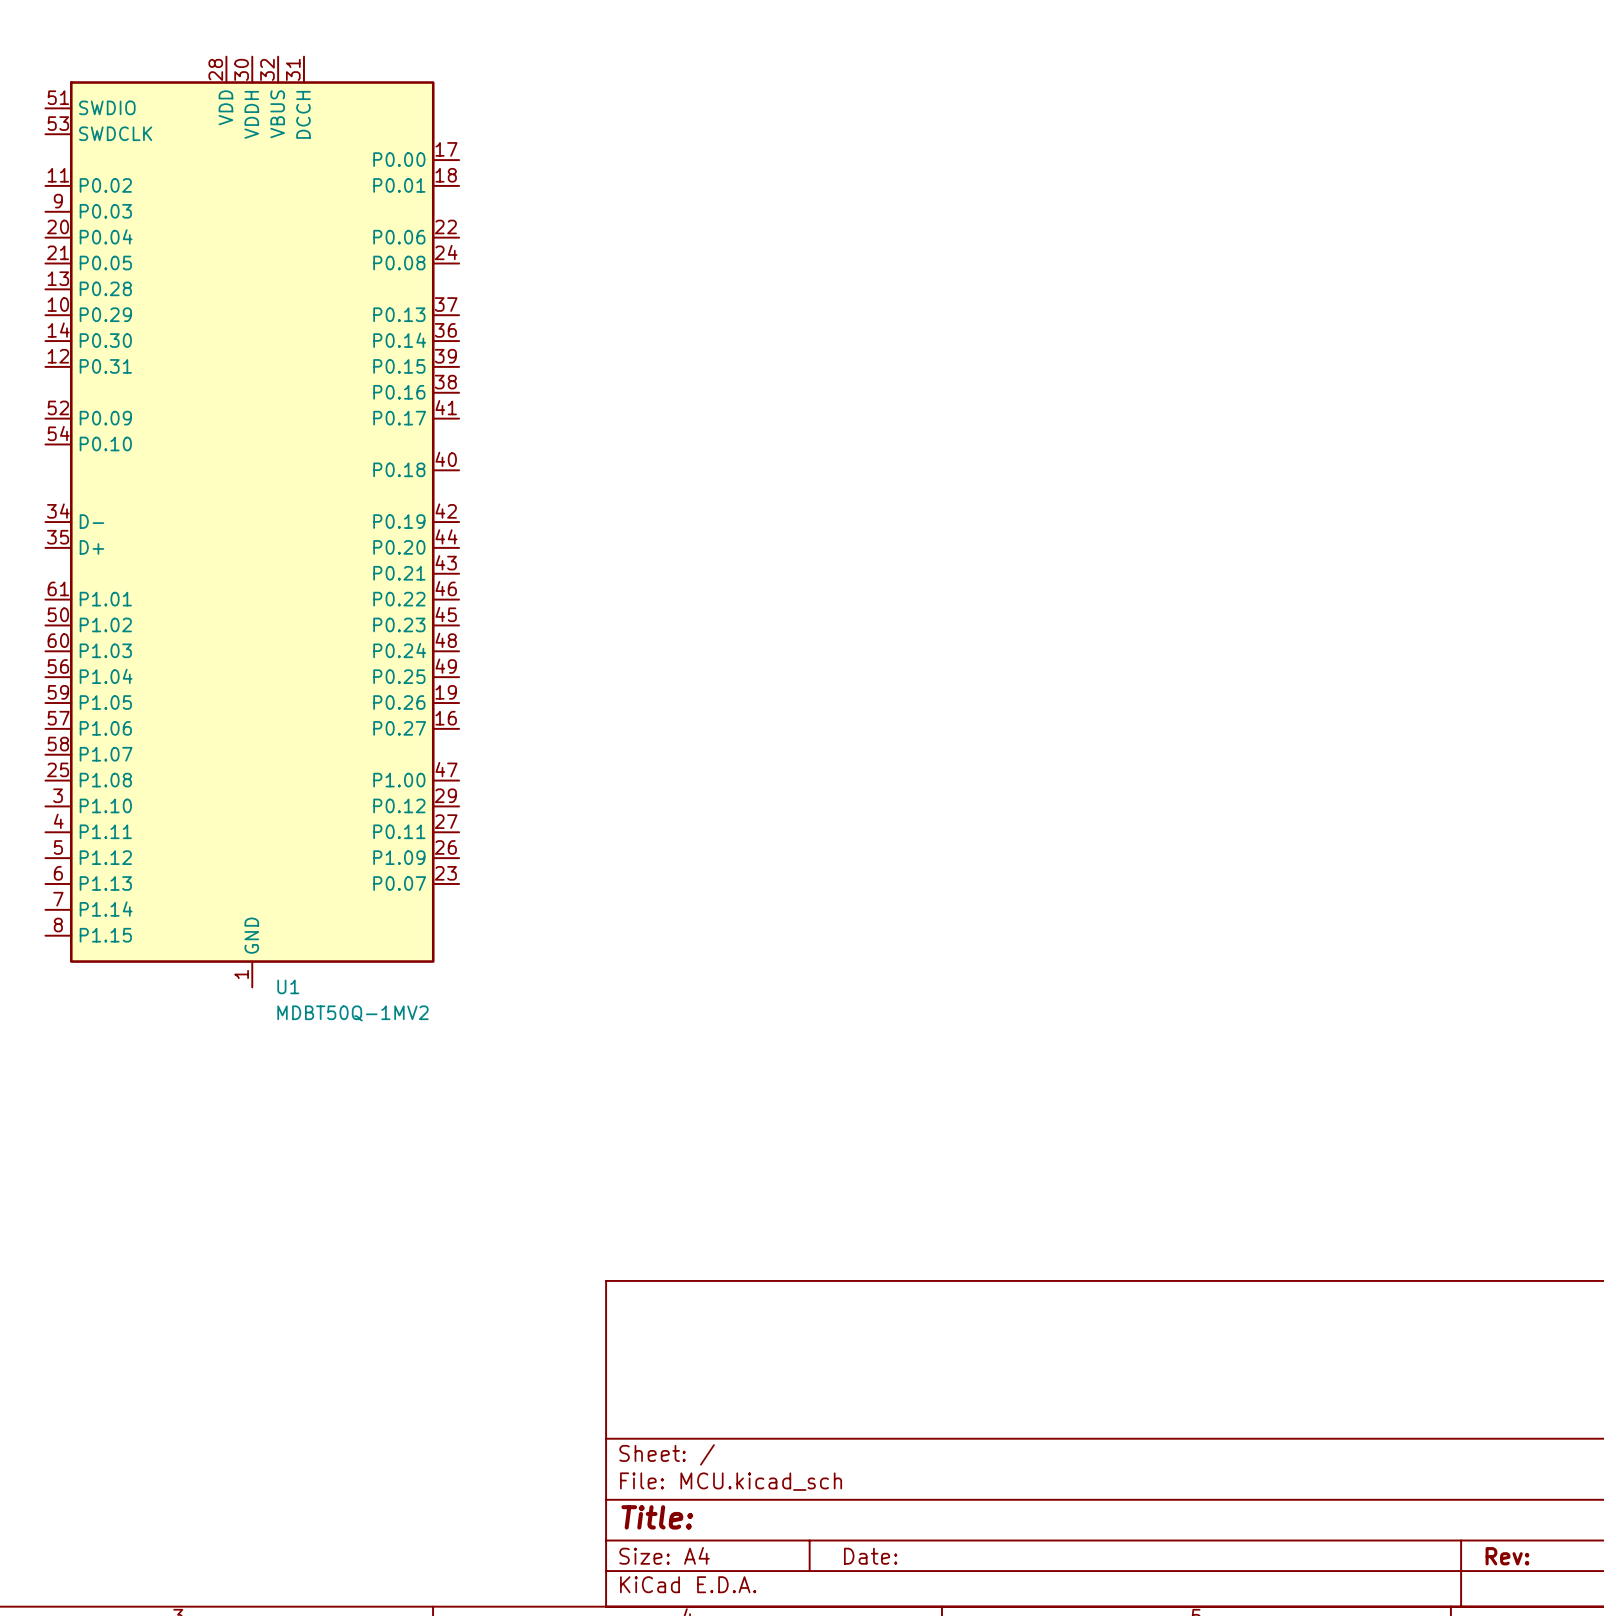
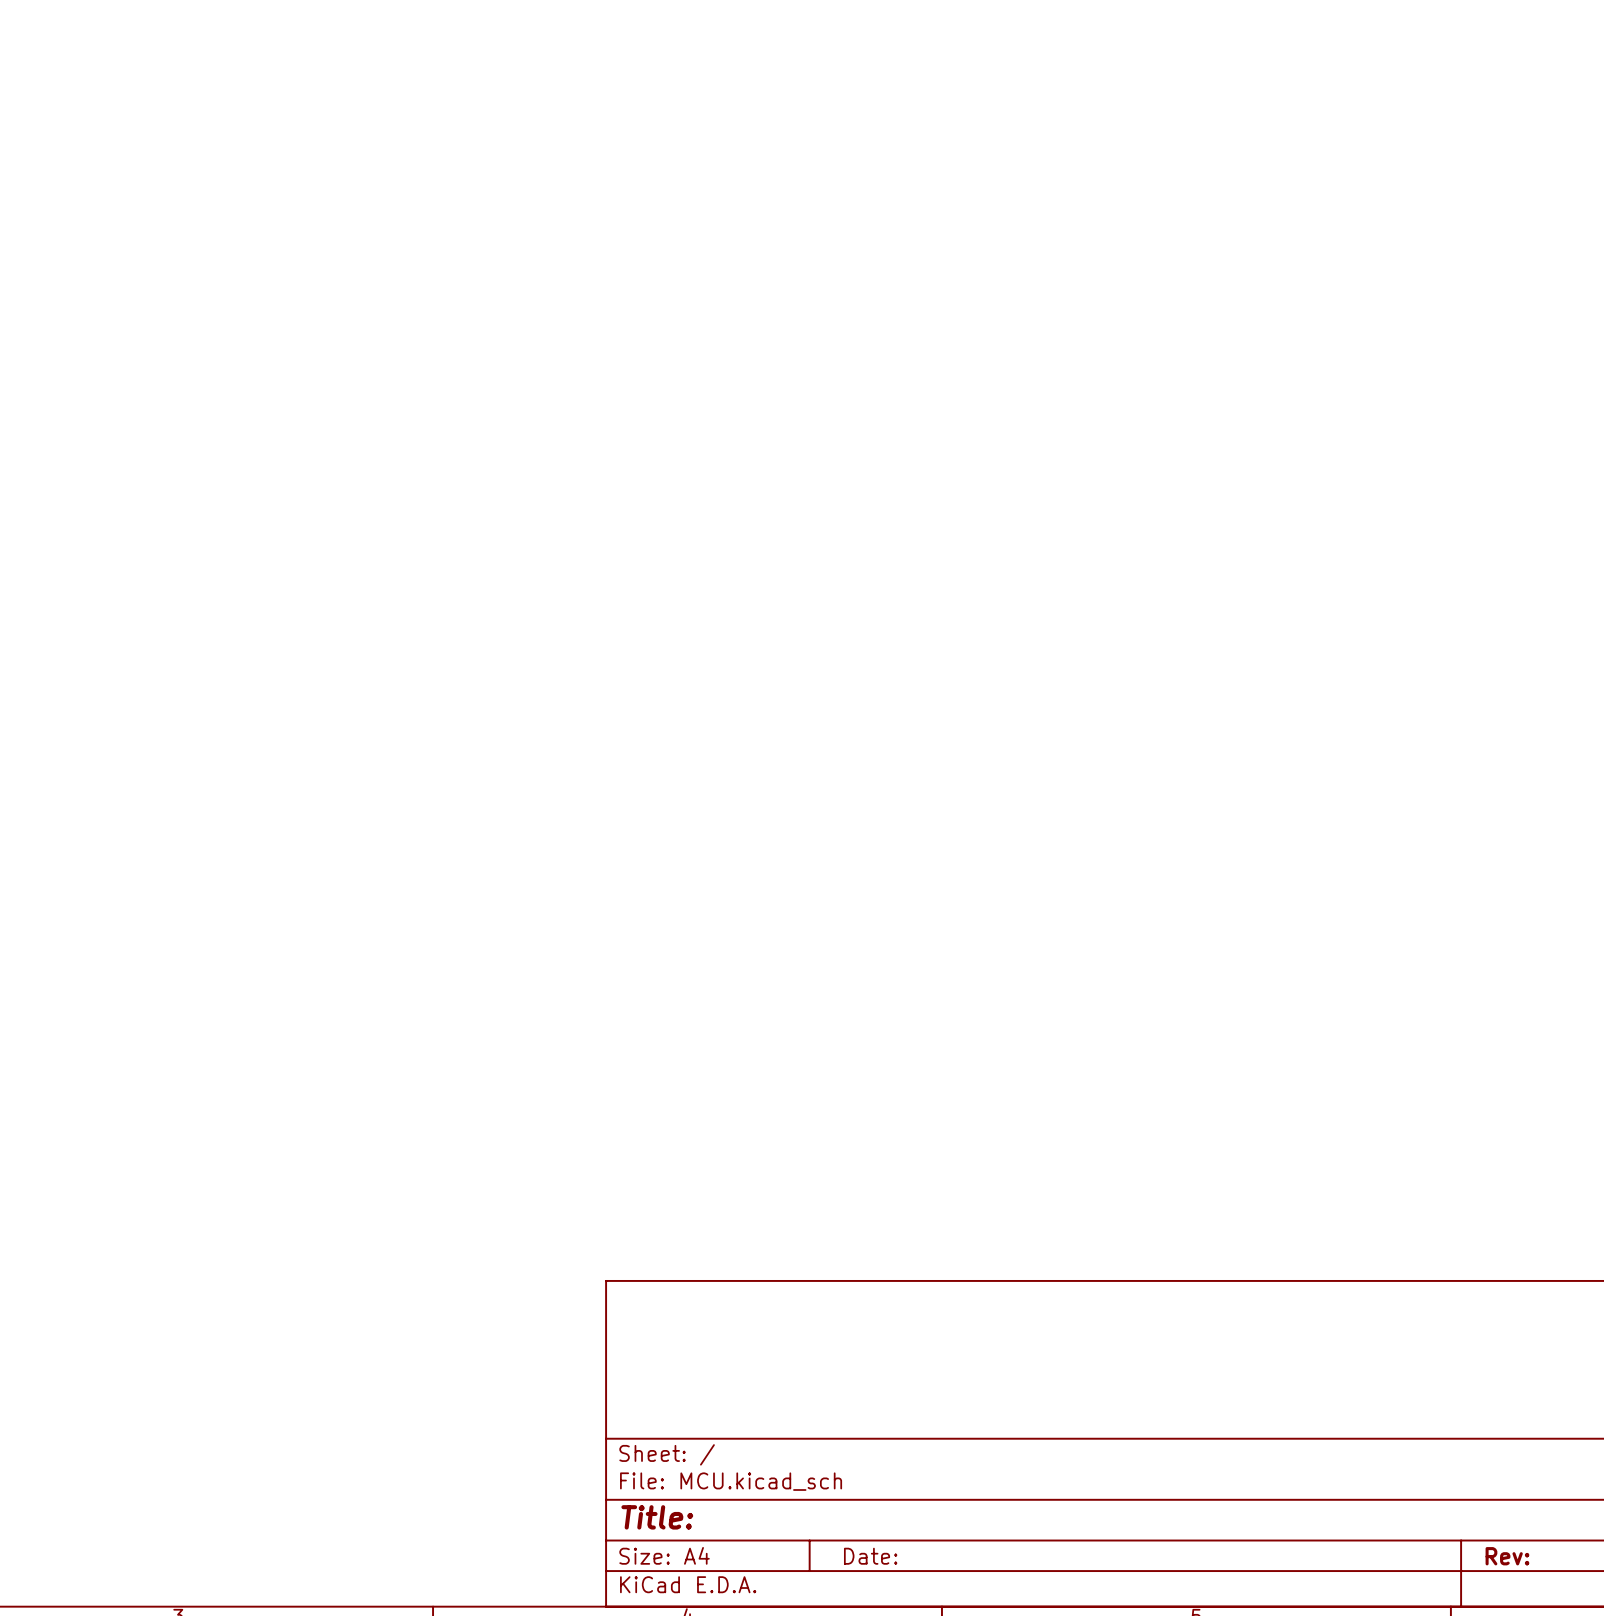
U1: MDBT50Q-1MV2 (252, 522) -> none

